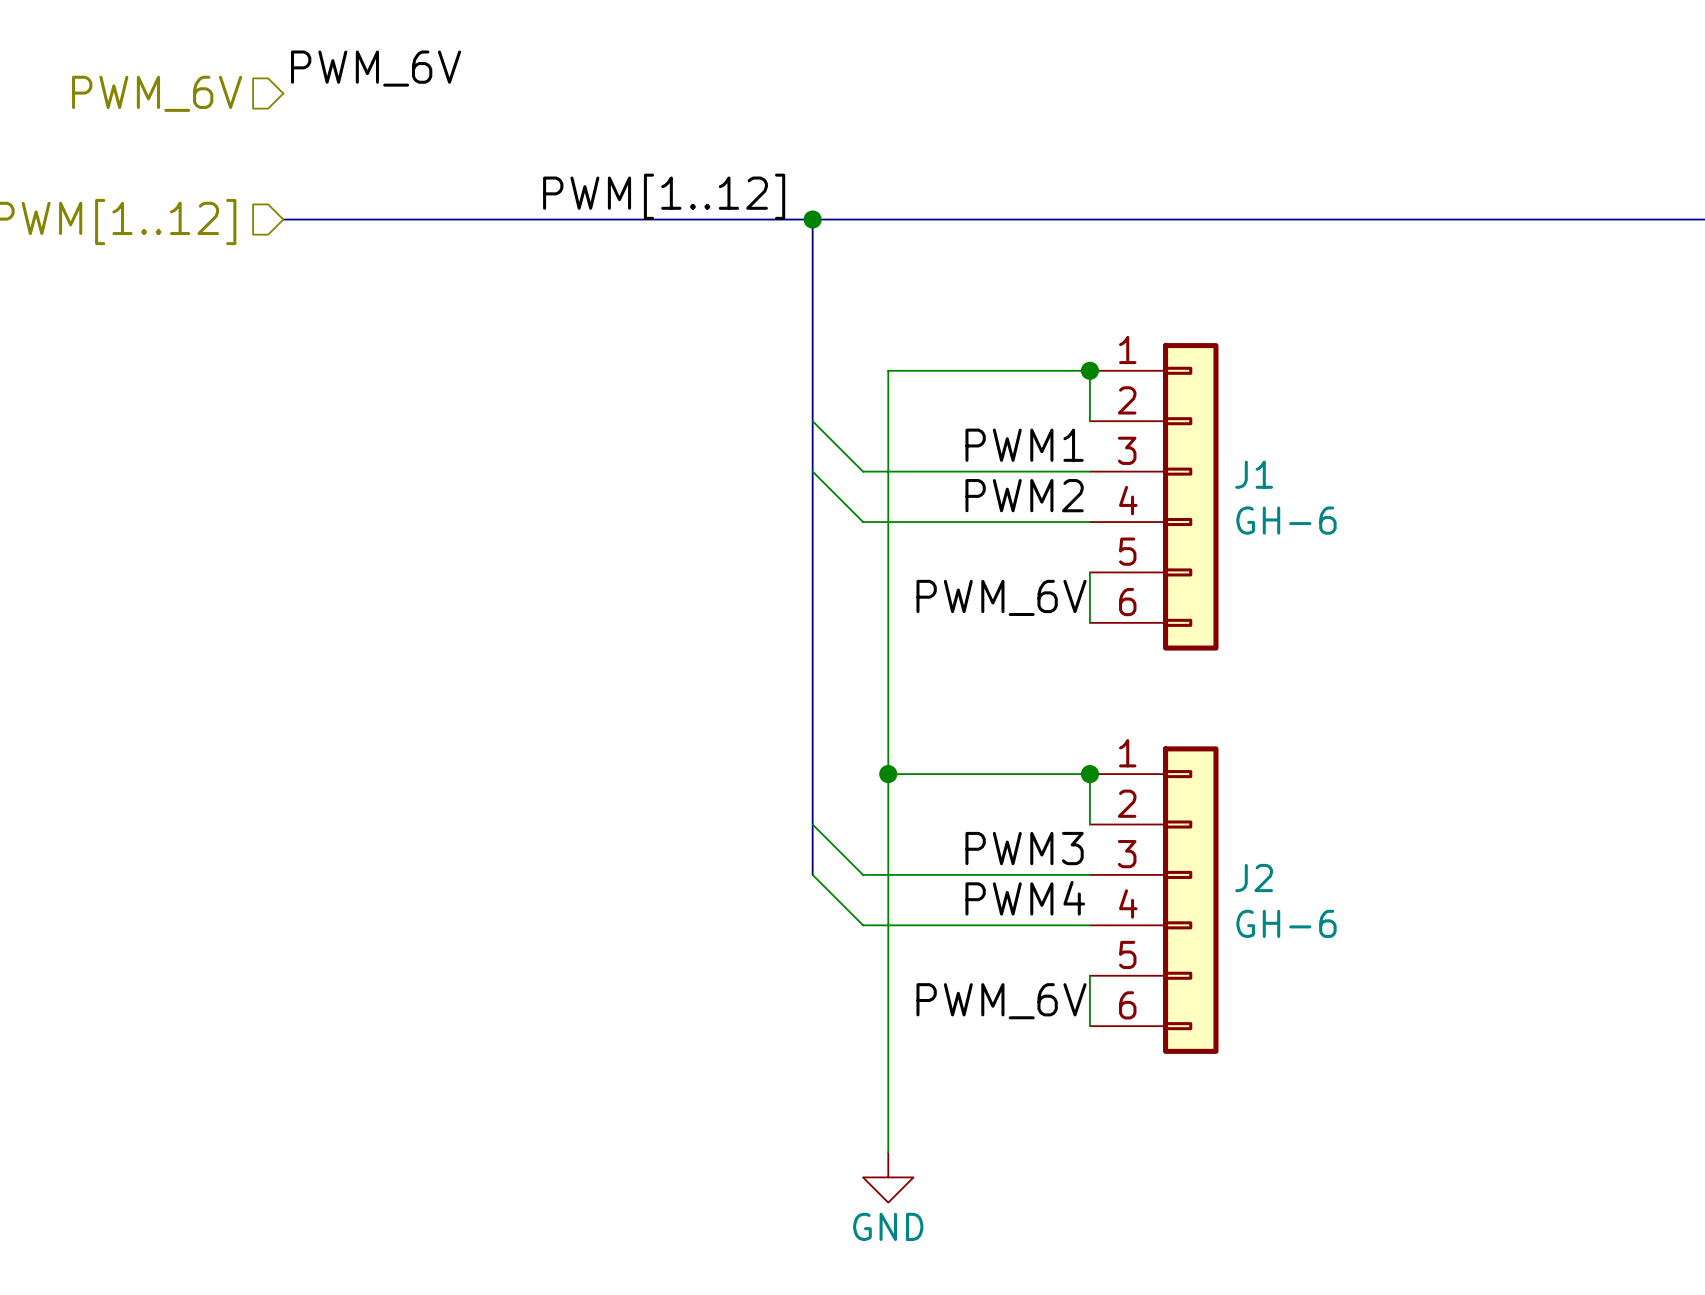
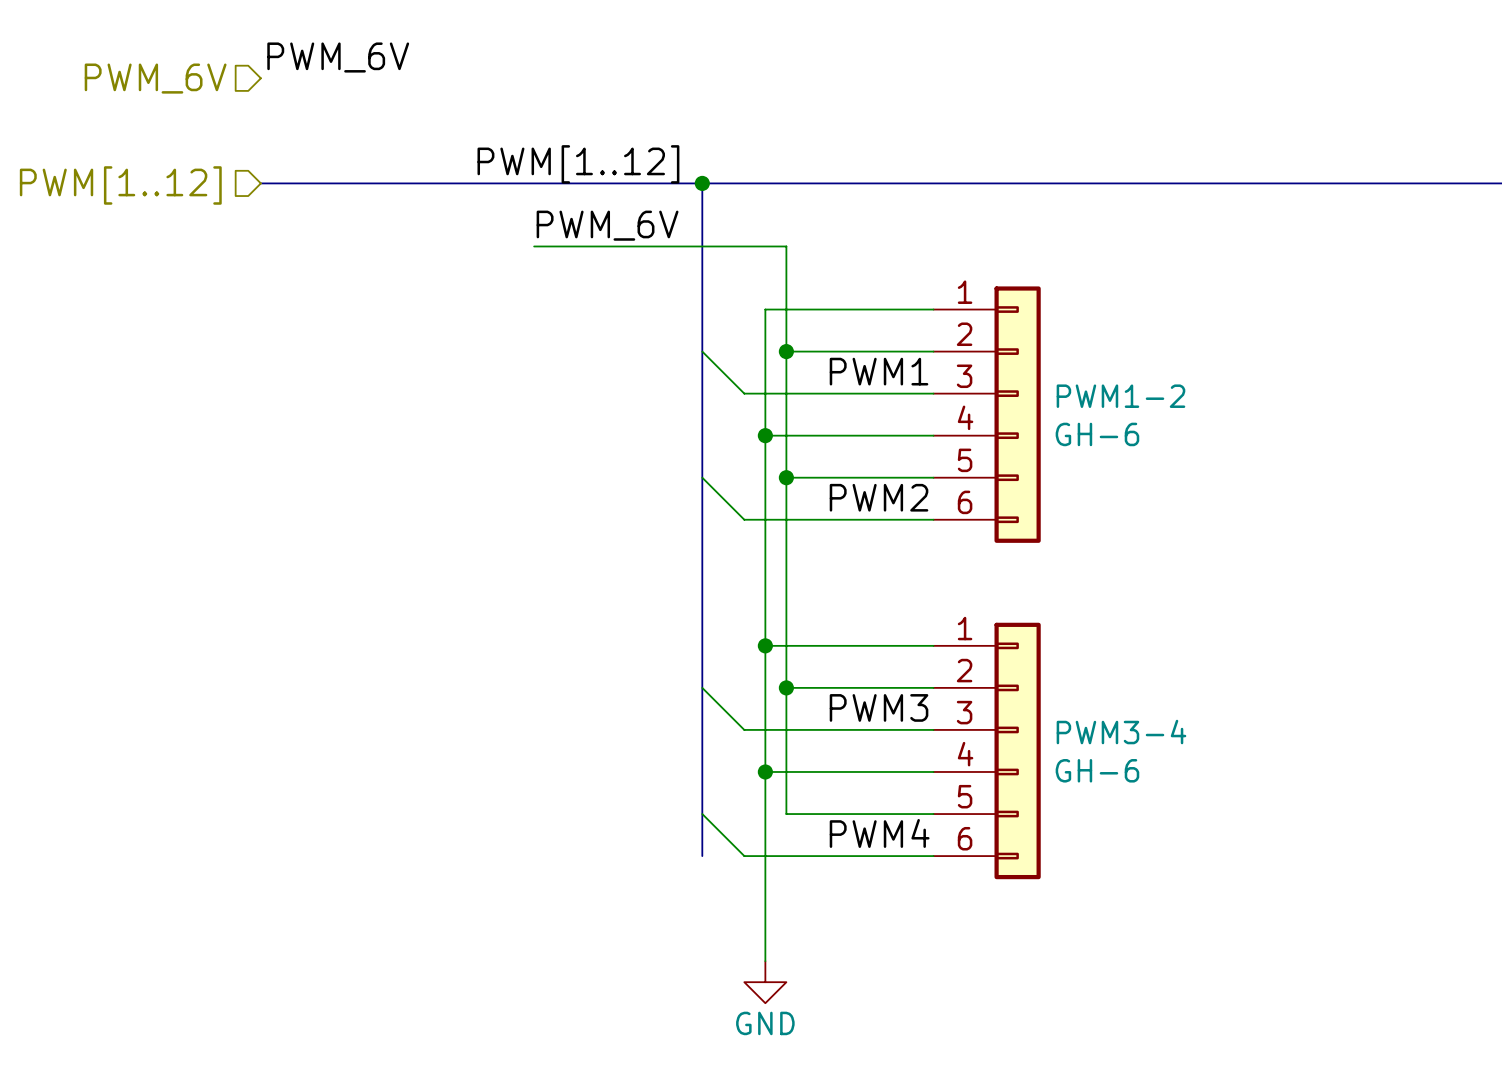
label: none -> PWM_6V (607, 225)
wire: none -> (534, 246) (786, 246) (786, 814) (933, 814)
wire: (1089, 370) (1089, 421) -> (786, 351) (933, 351)
junction: (1089, 370) -> none
junction: none -> (786, 351)
wire: (812, 471) (863, 522) (888, 522) -> none
J1 name: J1 (1254, 474) -> PWM1-2 (1120, 396)
label: PWM2 (1024, 495) -> none
junction: none -> (765, 435)
wire: none -> (702, 477) (744, 519) (933, 519)
junction: none -> (786, 477)
wire: (1089, 572) (1089, 622) -> (933, 477) (786, 477)
label: PWM_6V (1001, 597) -> PWM2 (879, 497)
wire: (1089, 774) (1089, 824) -> (786, 687) (933, 687)
junction: (1089, 774) -> none
junction: none -> (786, 687)
wire: (812, 874) (863, 925) (888, 925) -> none
bus: none -> (702, 729) (702, 856)
J2 name: J2 (1254, 878) -> PWM3-4 (1121, 732)
label: PWM4 (1025, 898) -> none
junction: none -> (765, 771)
wire: (1089, 975) (1089, 1026) -> (702, 814) (744, 856) (933, 856)
label: PWM_6V (1001, 1001) -> PWM4 (879, 833)

